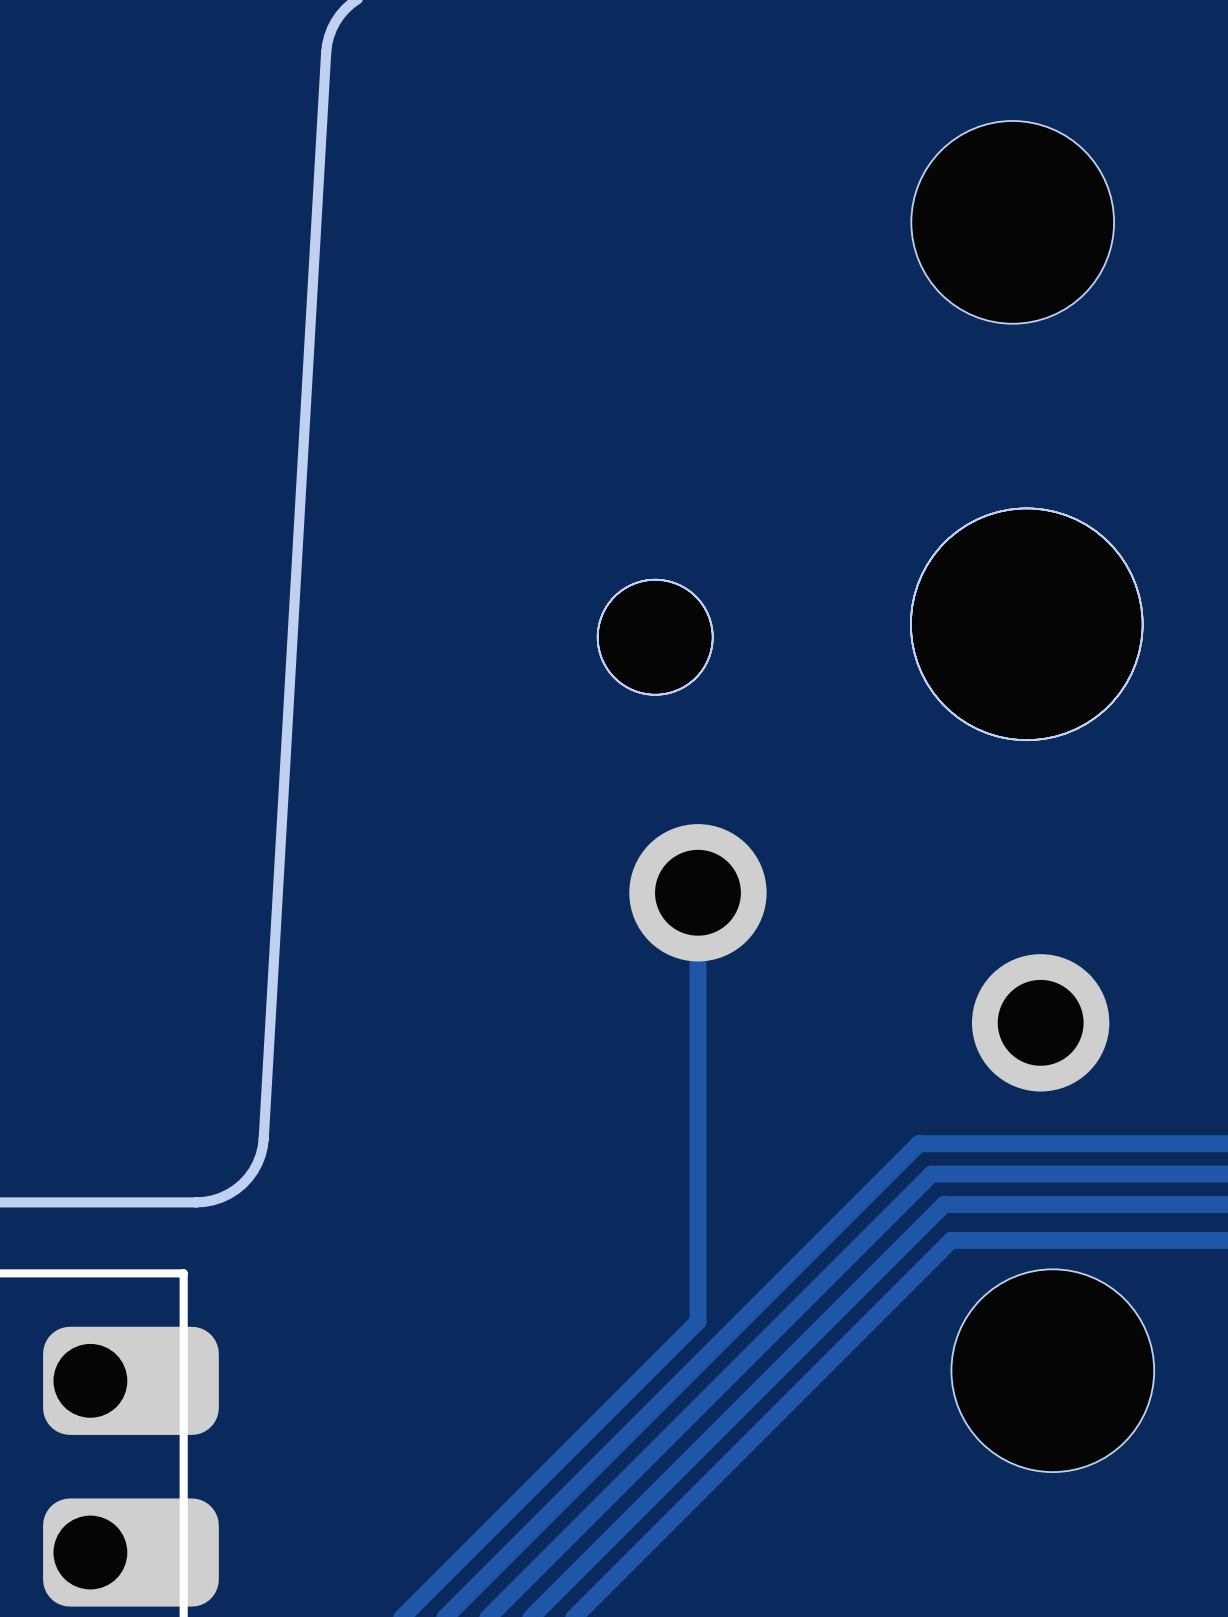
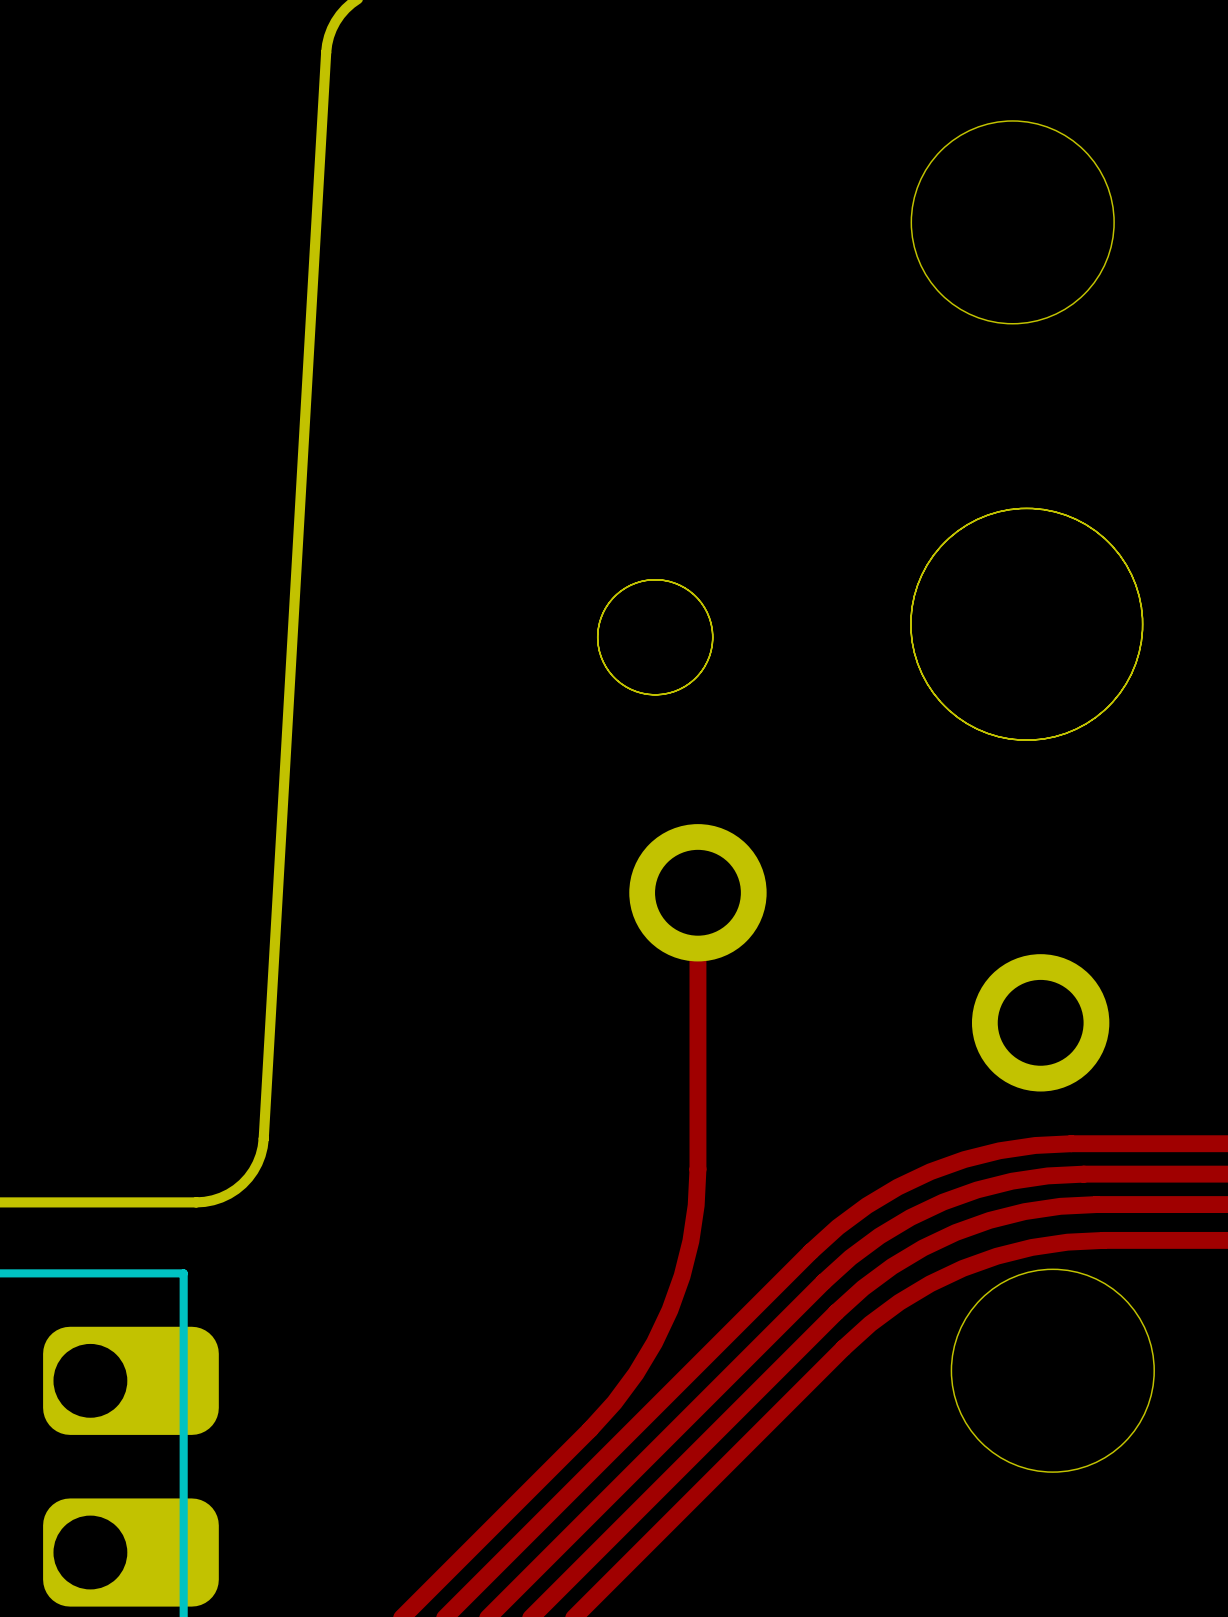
track: (1071, 1143) (918, 1143) (811, 1251) -> (1071, 1143) (1035, 1145) (999, 1150) (964, 1159) (930, 1171) (897, 1187) (866, 1205) (837, 1227) (811, 1251)
track: (697, 1169) (697, 1321) (590, 1429) -> (697, 1169) (696, 1205) (690, 1241) (682, 1276) (669, 1310) (654, 1342) (635, 1373) (614, 1402) (590, 1429)
track: (1083, 1174) (931, 1174) (823, 1281) -> (1083, 1174) (1047, 1175) (1012, 1181) (977, 1189) (943, 1202) (910, 1217) (879, 1236) (850, 1257) (823, 1281)
track: (1096, 1204) (944, 1204) (836, 1312) -> (1096, 1204) (1060, 1206) (1024, 1211) (989, 1220) (955, 1232) (923, 1247) (892, 1266) (863, 1288) (836, 1312)
track: (1103, 1240) (951, 1240) (843, 1348) -> (1103, 1240) (1067, 1242) (1031, 1247) (996, 1256) (962, 1268) (930, 1283) (899, 1302) (870, 1323) (843, 1348)

